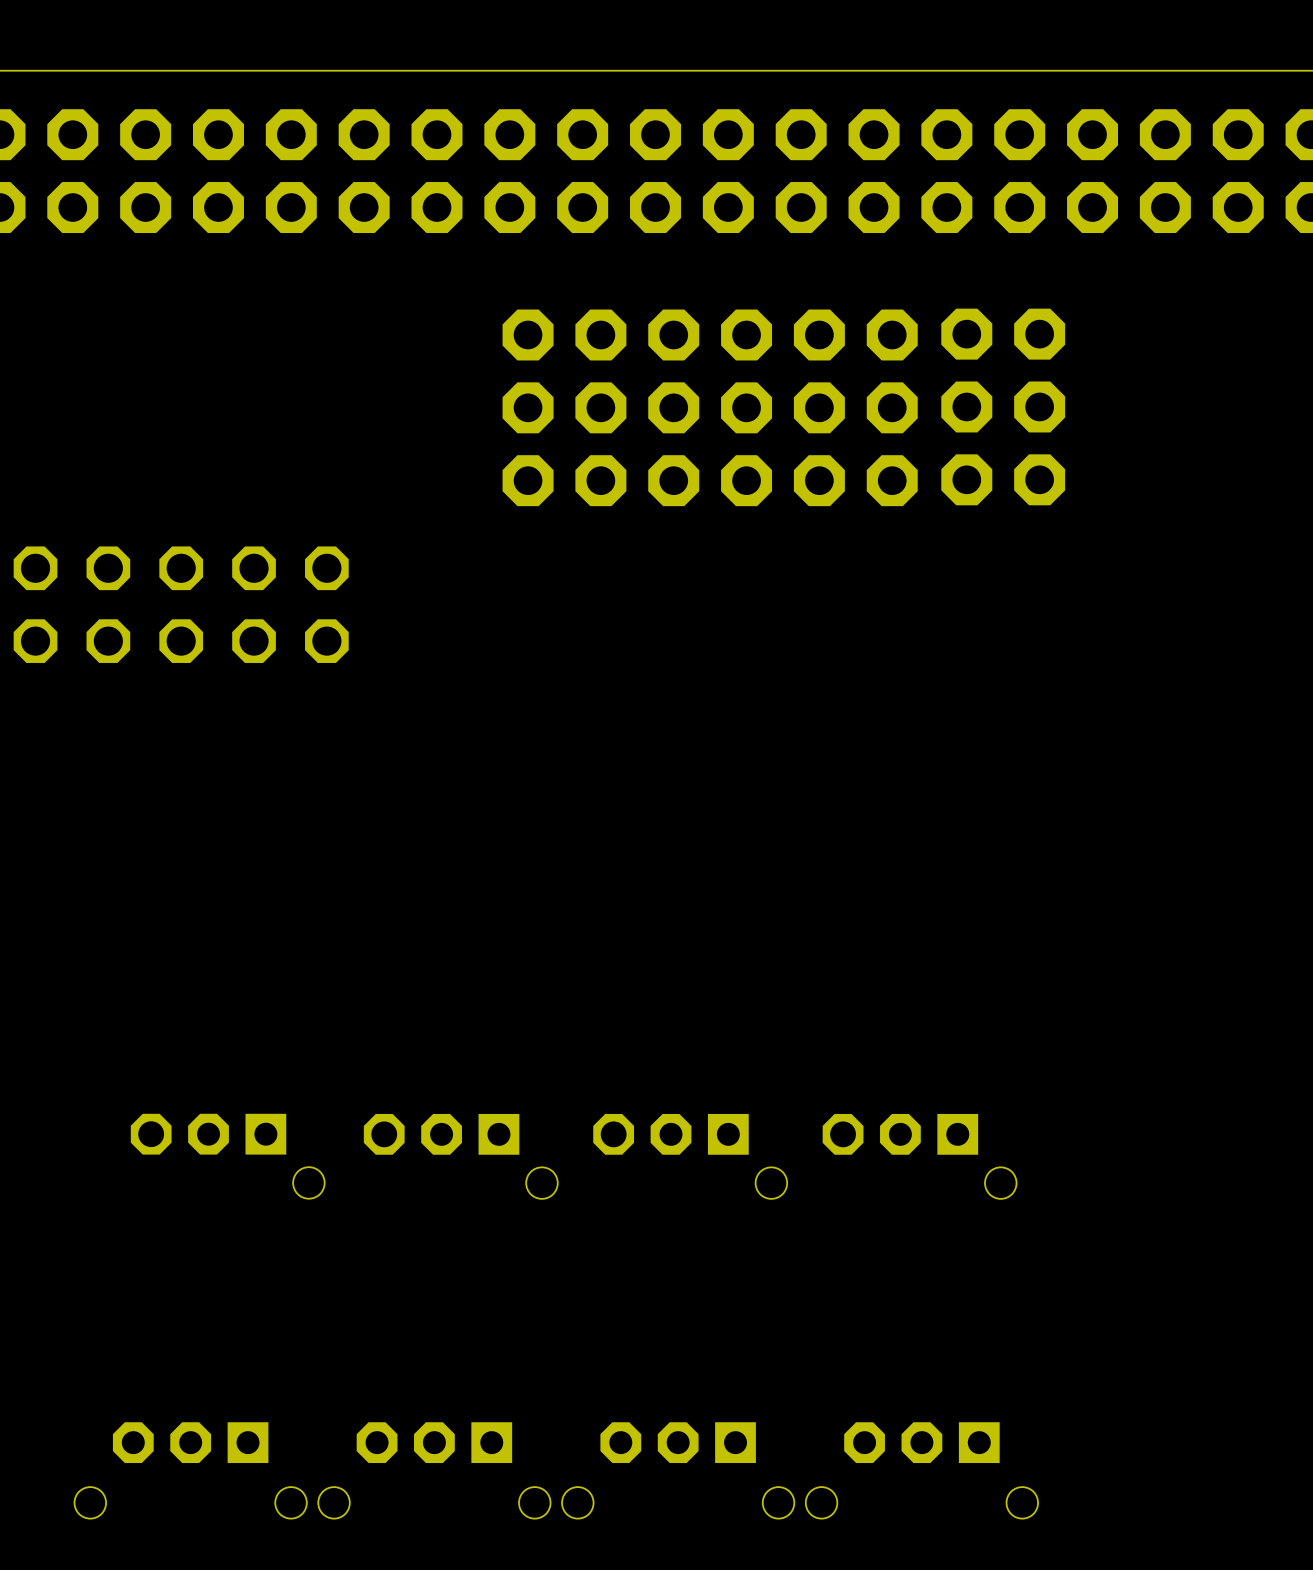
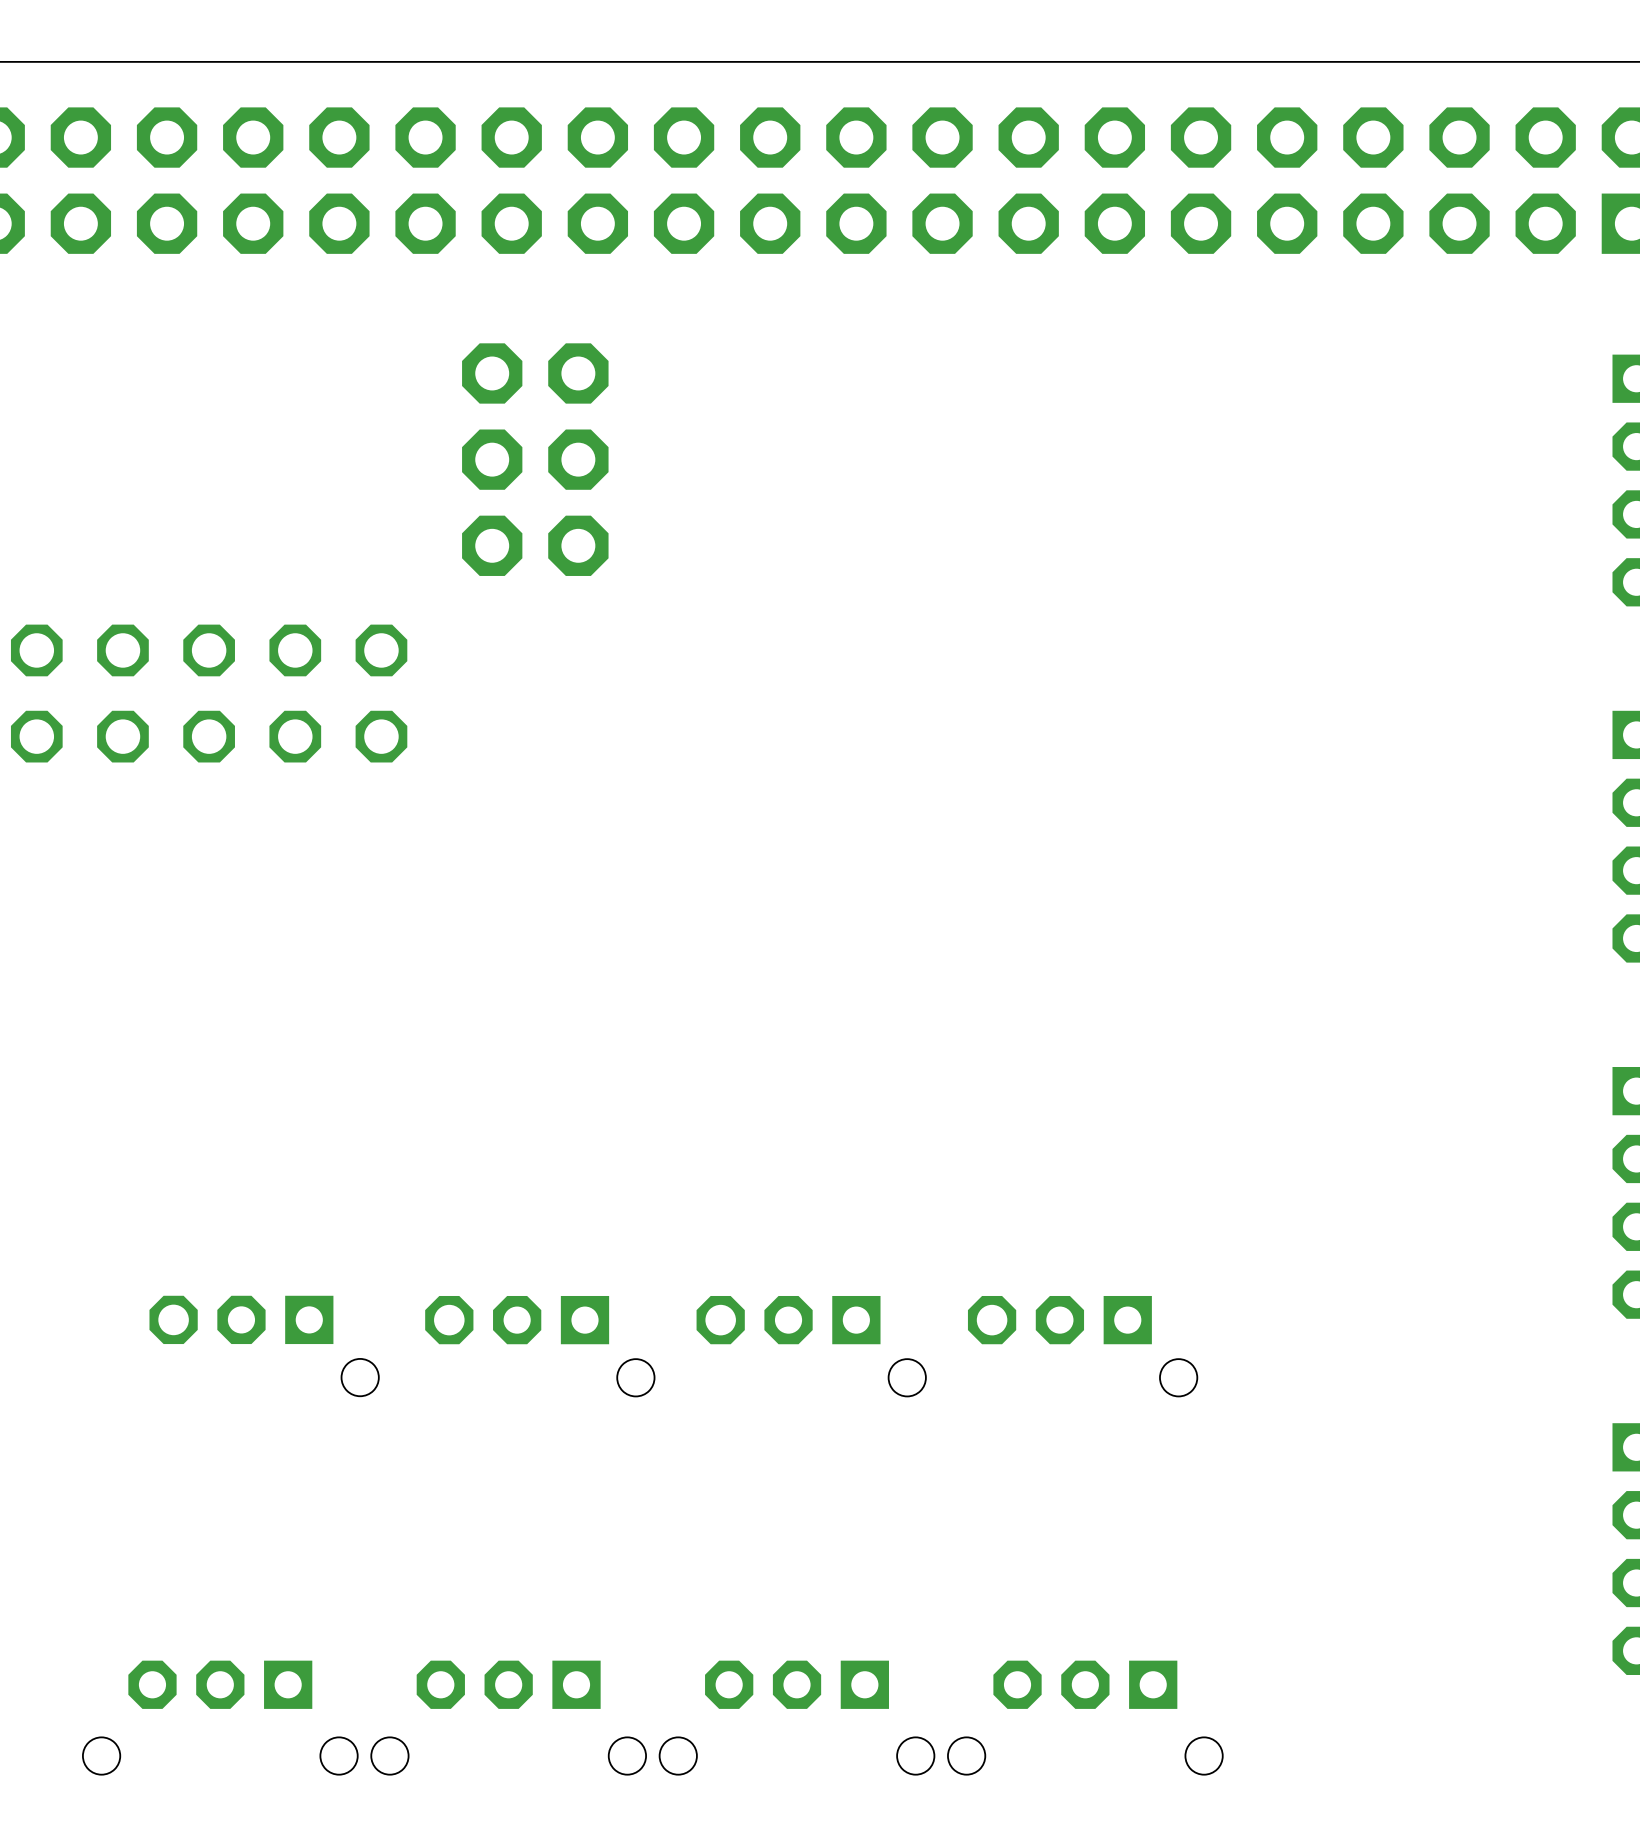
part: none -> (492, 459)
part: (966, 406) -> none
part: (1039, 406) -> none
part position: (528, 407) -> (578, 459)
part: (600, 407) -> none
part: (673, 407) -> none
part: (746, 407) -> none
part: (819, 407) -> none
part: (892, 407) -> none

